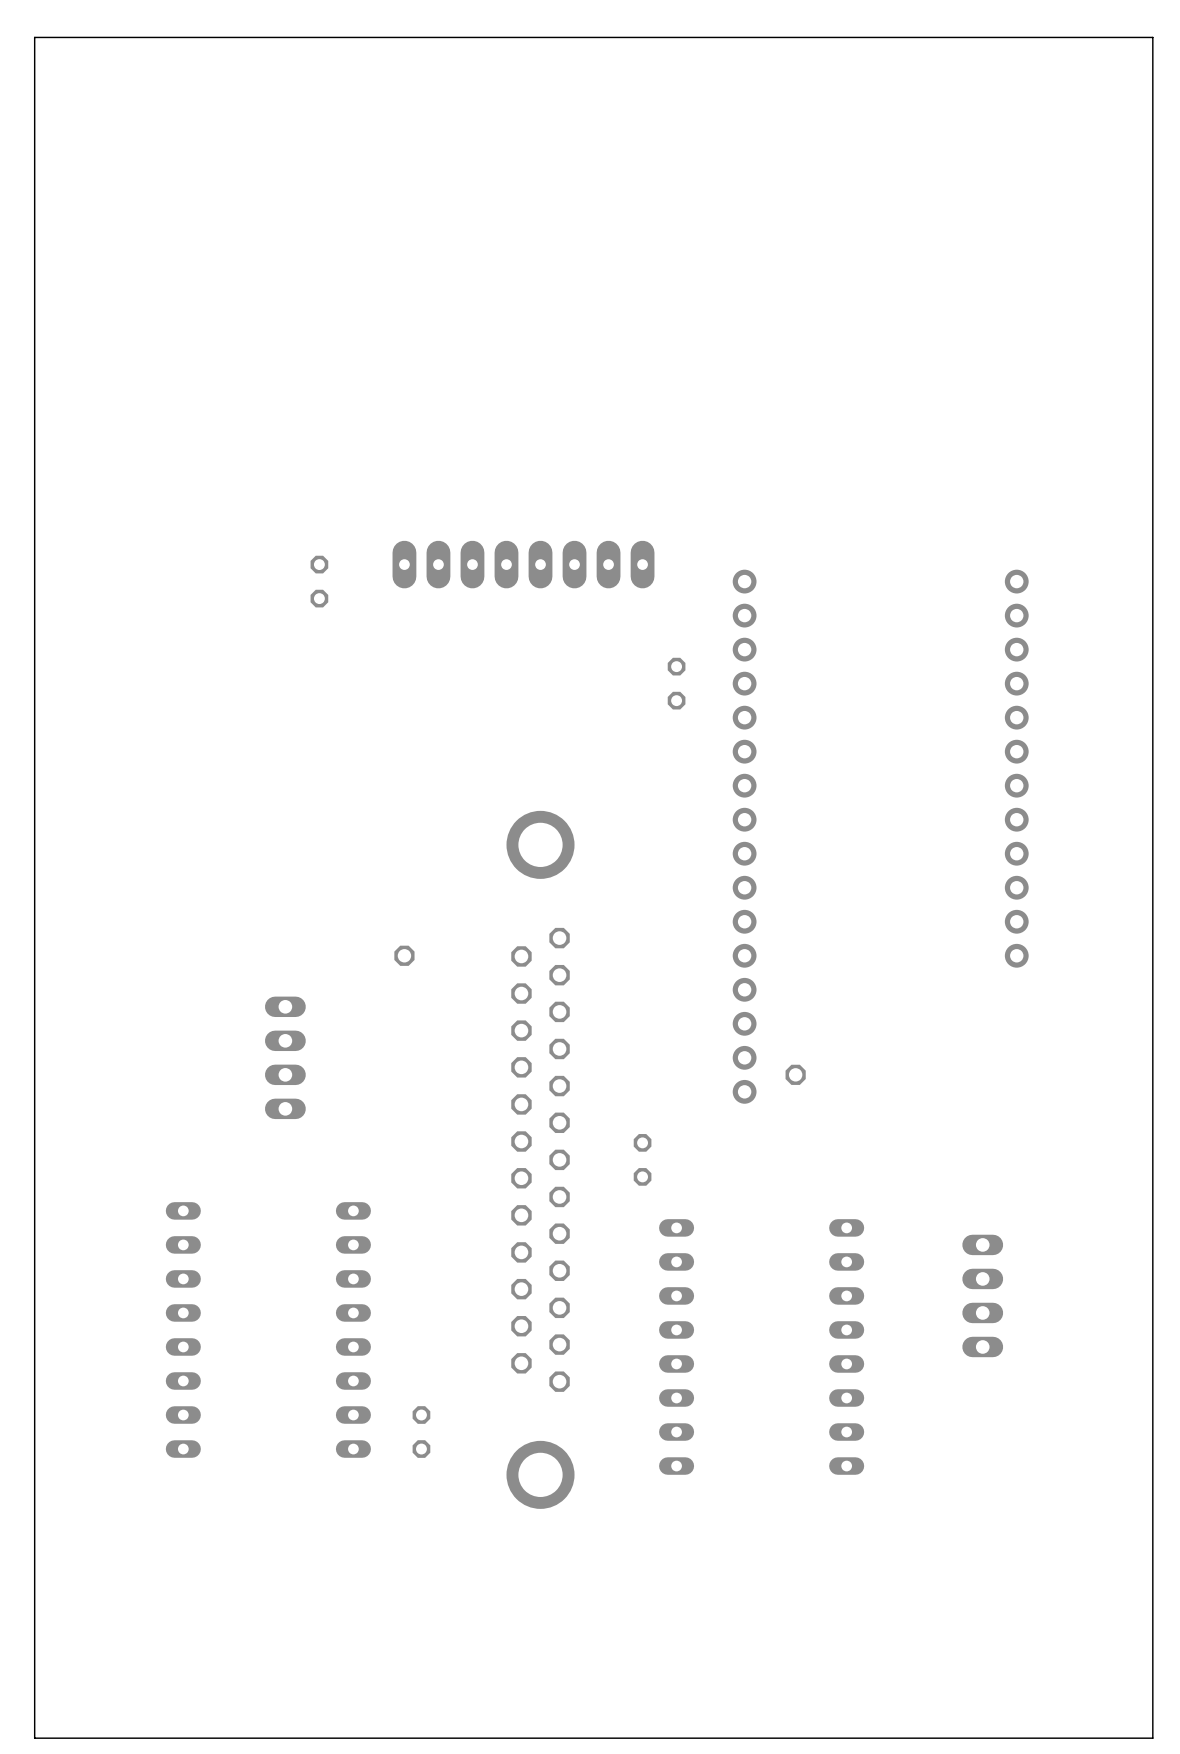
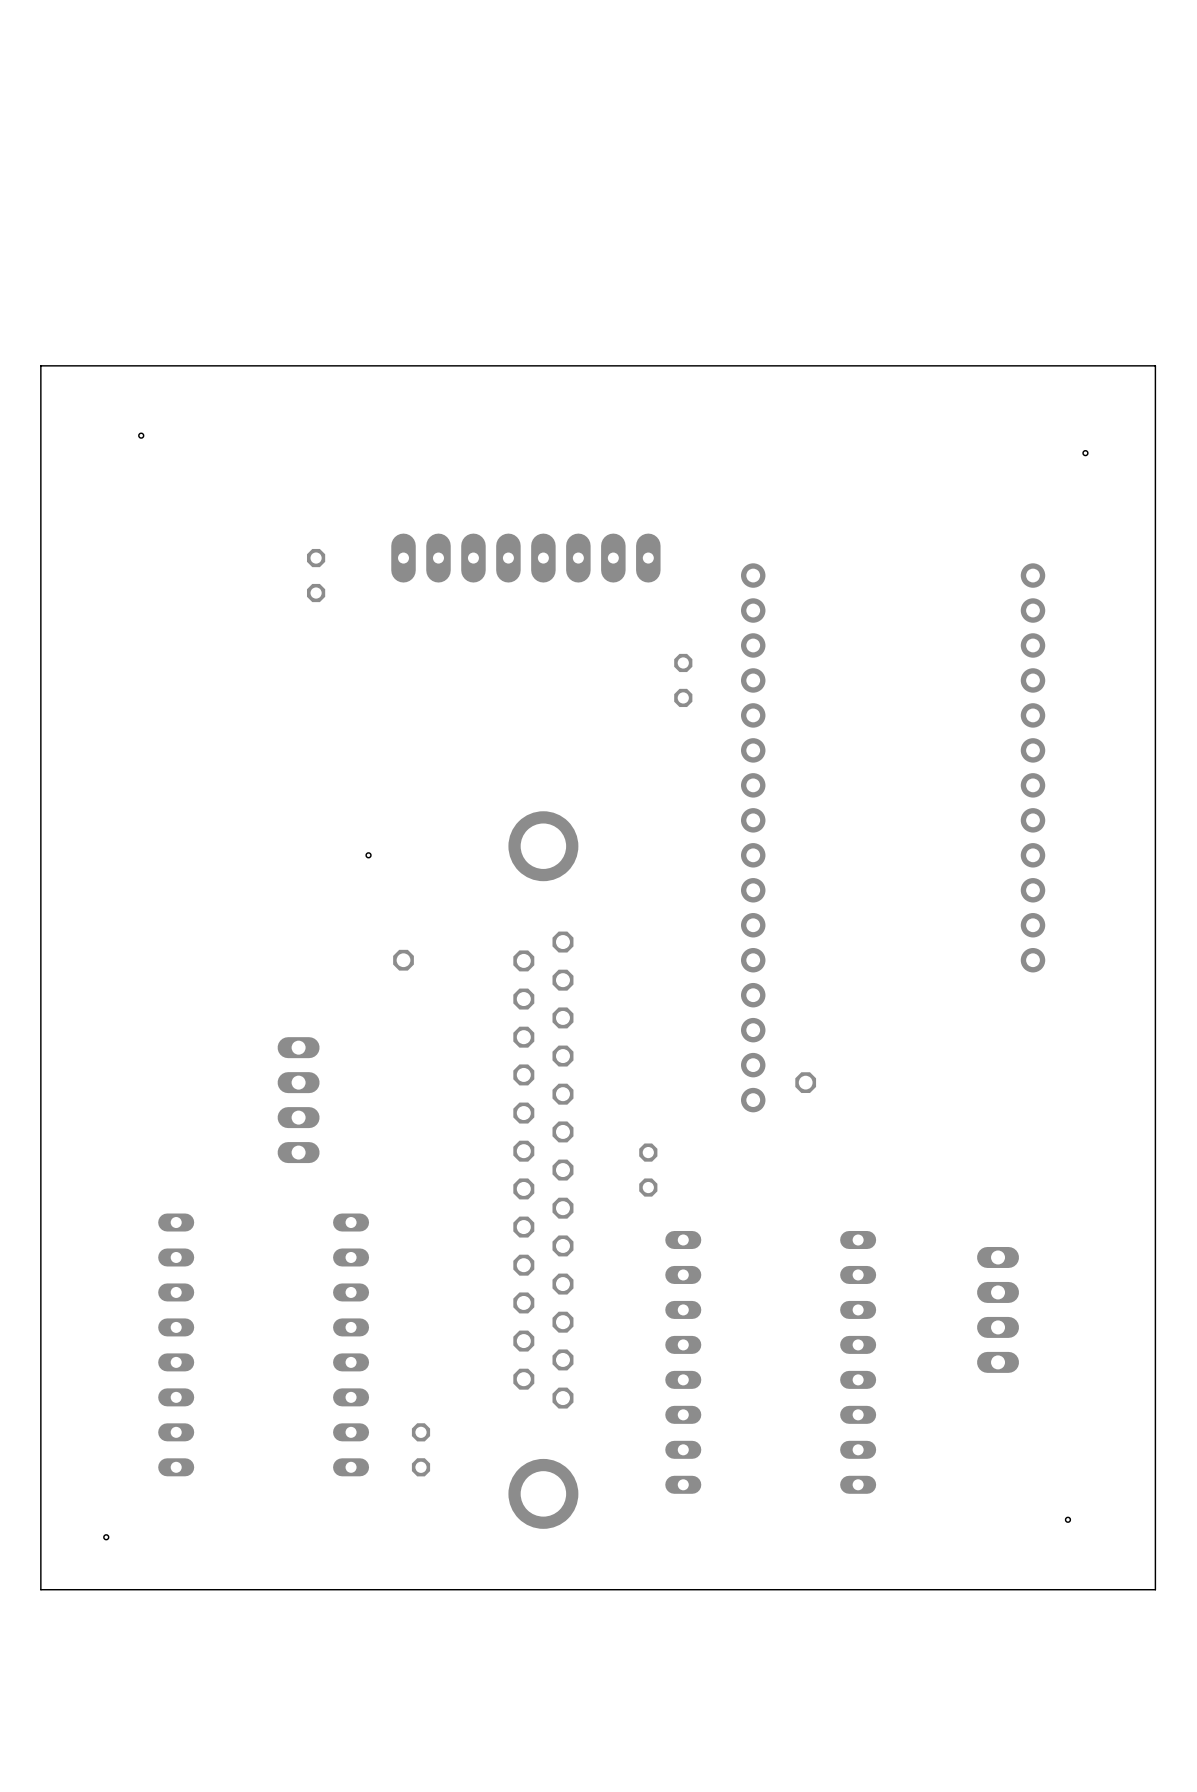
board edge: (1152, 37) (34, 37) (34, 1738) (1152, 1738) (1152, 37) -> (1155, 365) (1155, 1589) (40, 1589) (40, 365) (1155, 365)
hole: none -> (141, 435)
hole: none -> (1085, 453)
hole: none -> (368, 855)
part position: (285, 1057) -> (298, 1100)
hole: none -> (1067, 1519)
hole: none -> (106, 1537)

